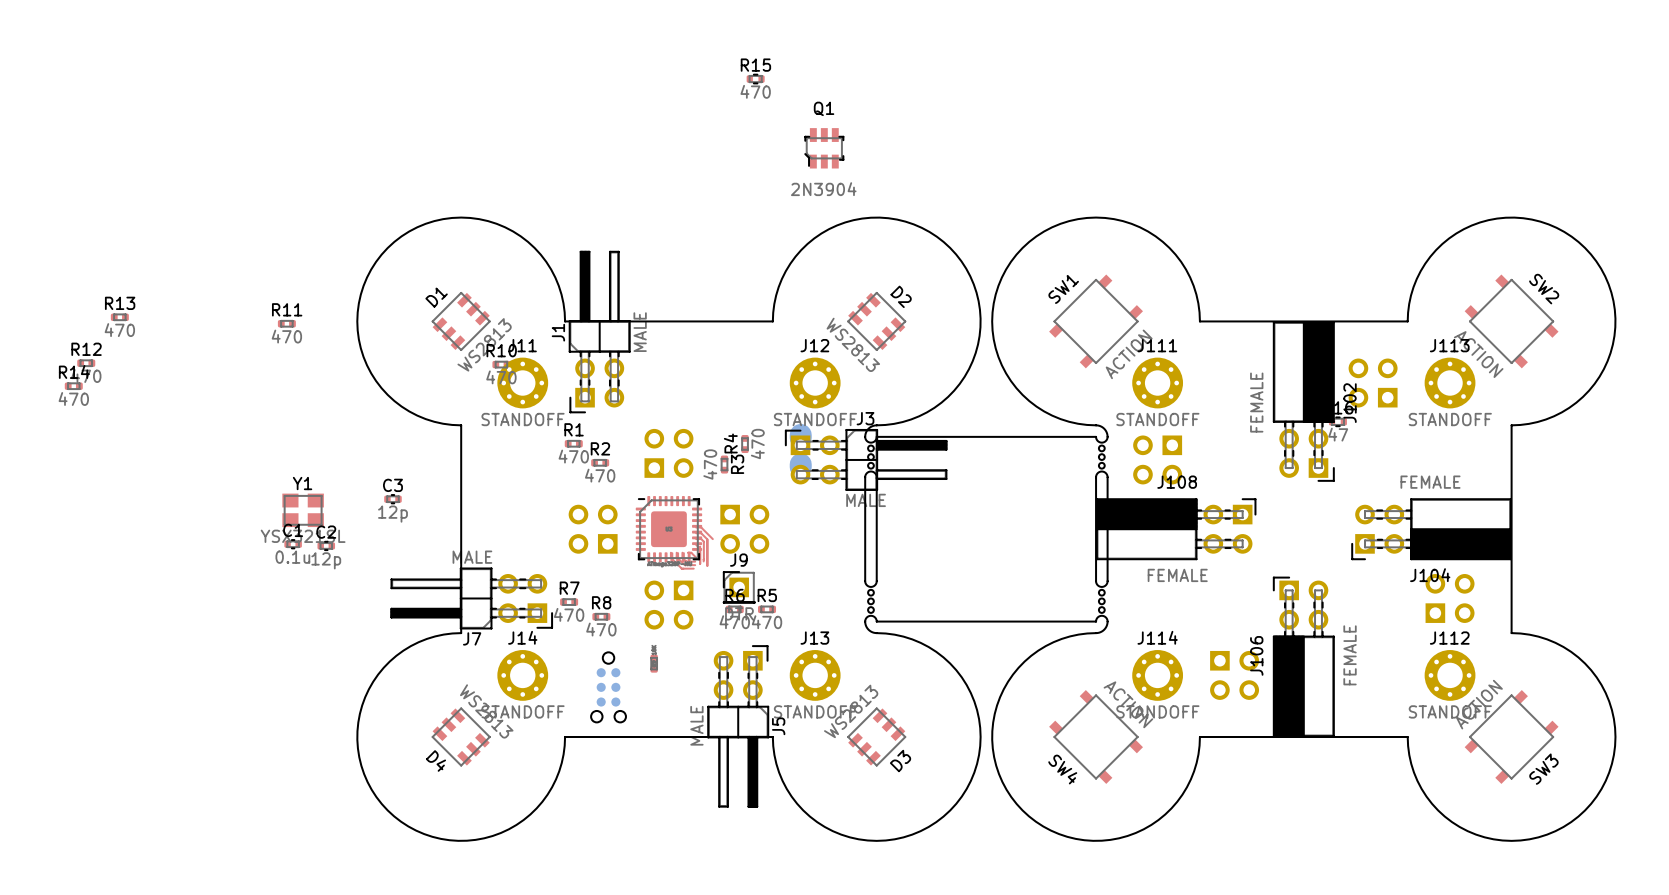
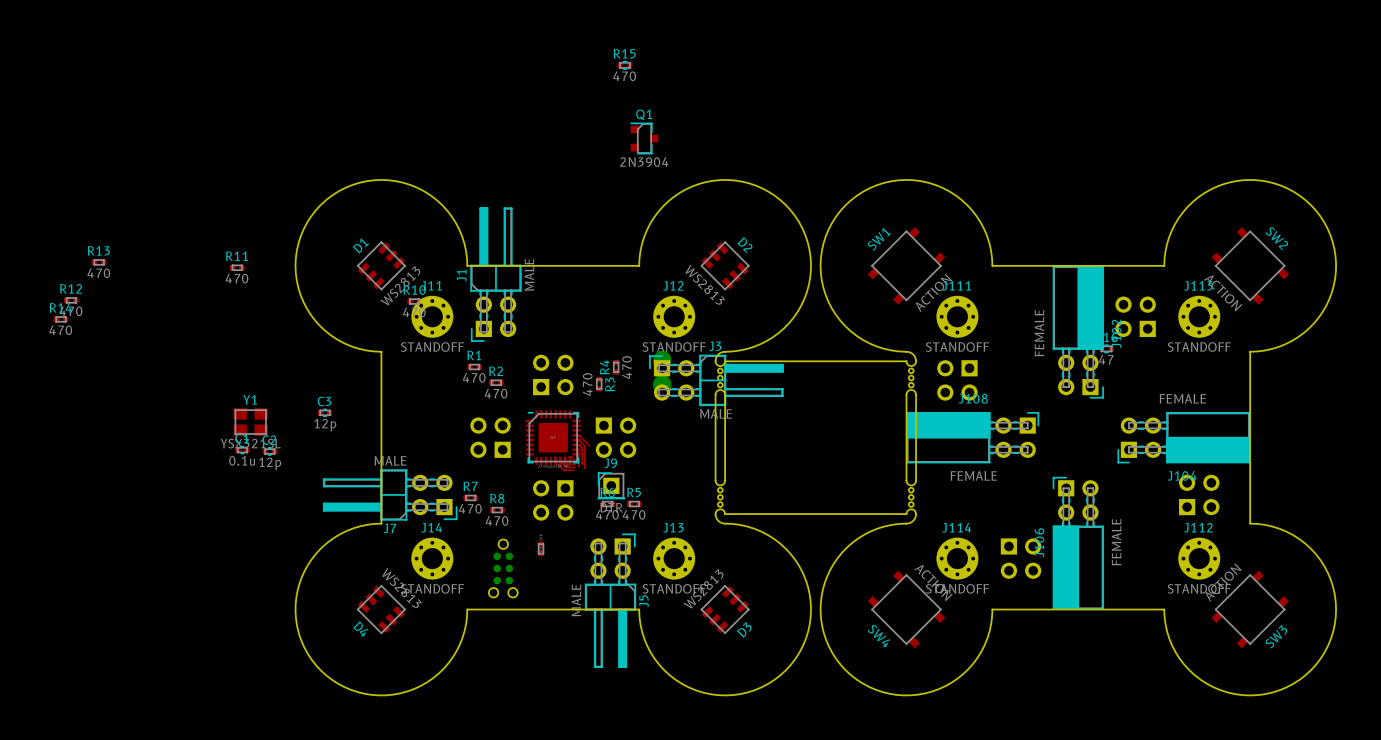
Q1 footprint: [804, 128, 844, 169] -> [630, 122, 659, 155]

